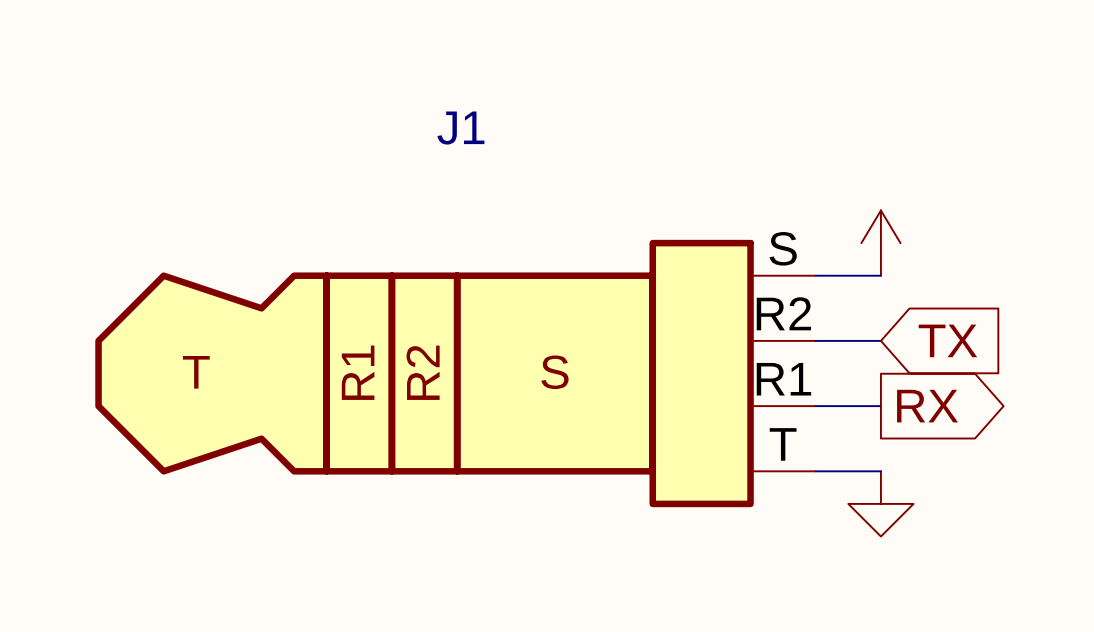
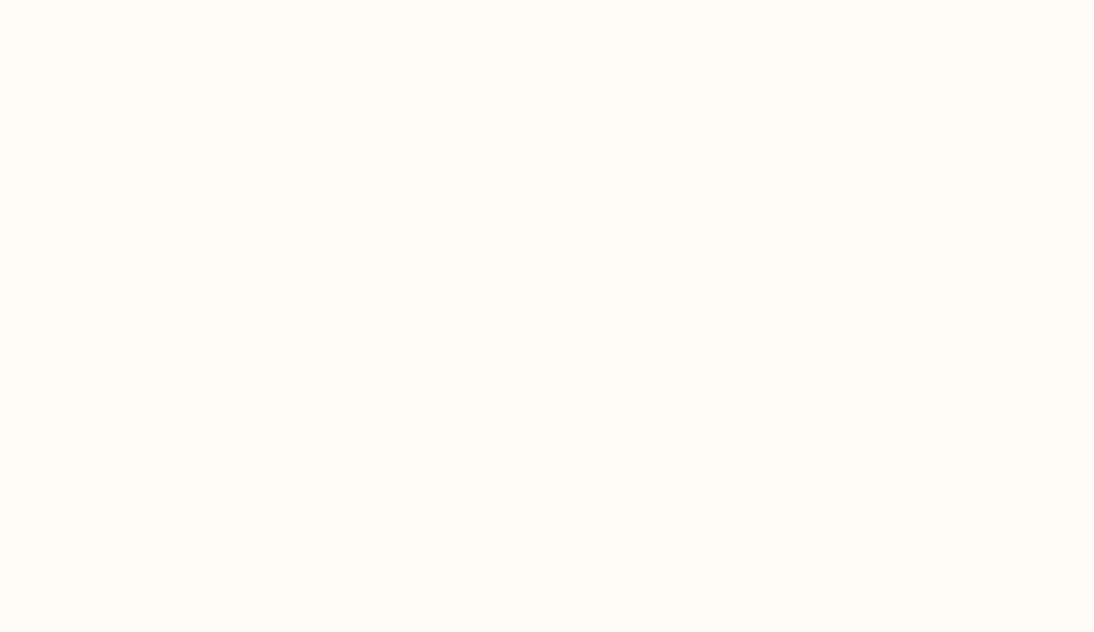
power symbol: (880, 243) -> none
wire: (815, 275) (880, 275) -> none
wire: (815, 340) (880, 340) -> none
global label: TX (947, 340) -> none
J1: (455, 373) -> none
wire: (815, 406) (880, 406) -> none
global label: RX (927, 406) -> none
wire: (815, 471) (880, 471) -> none
power symbol: (880, 503) -> none

